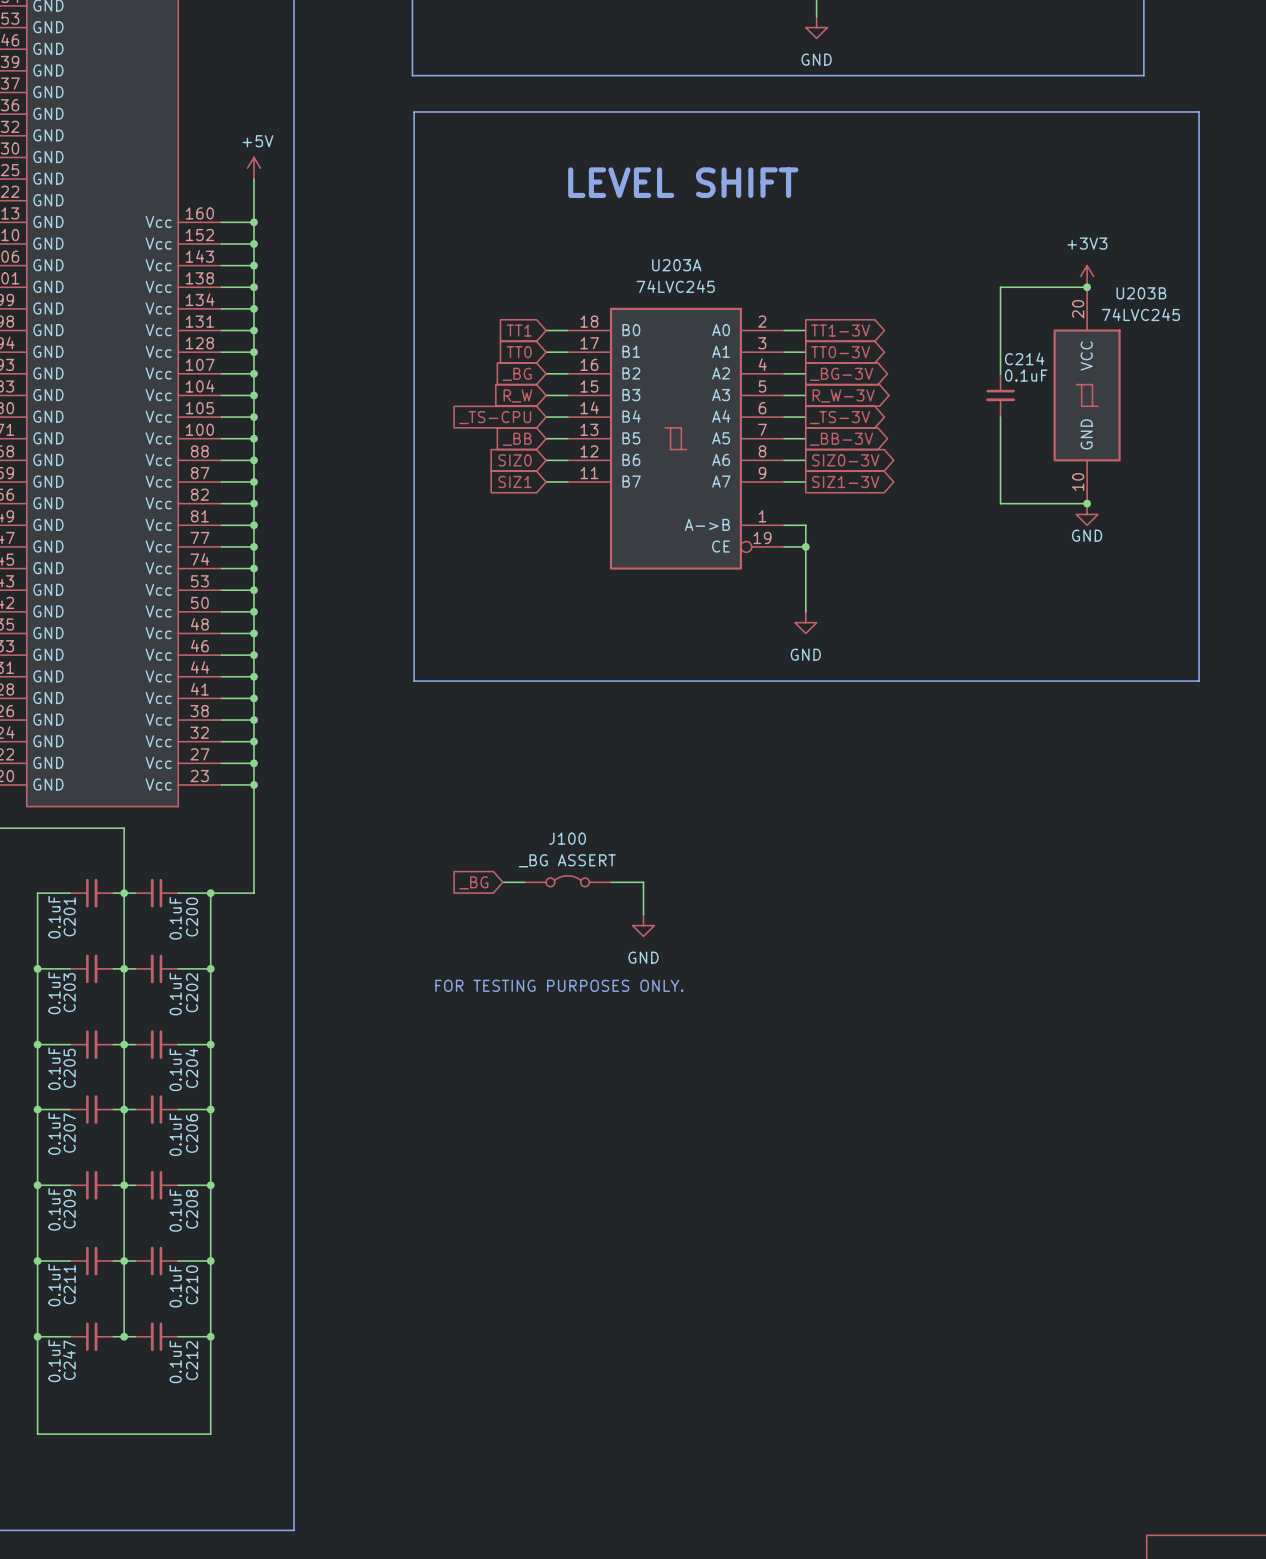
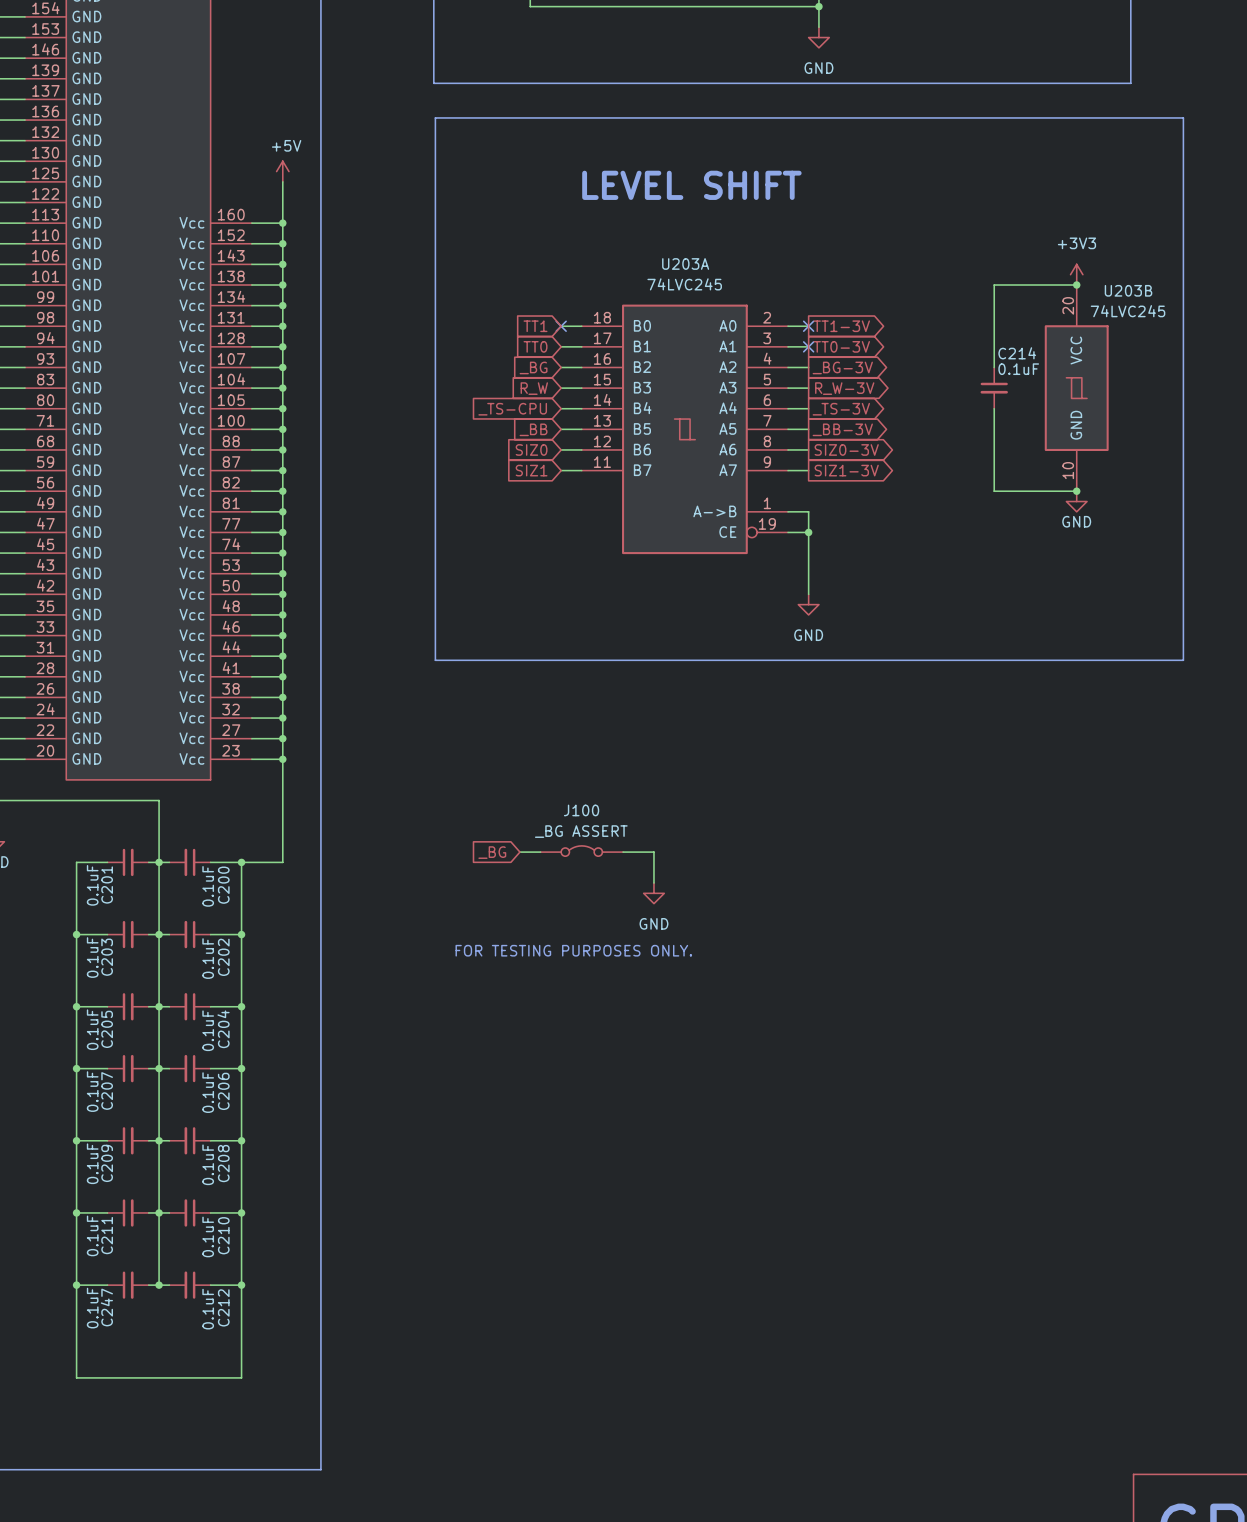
no-connect mark: none -> (561, 326)
no-connect mark: none -> (808, 326)
no-connect mark: none -> (808, 346)

